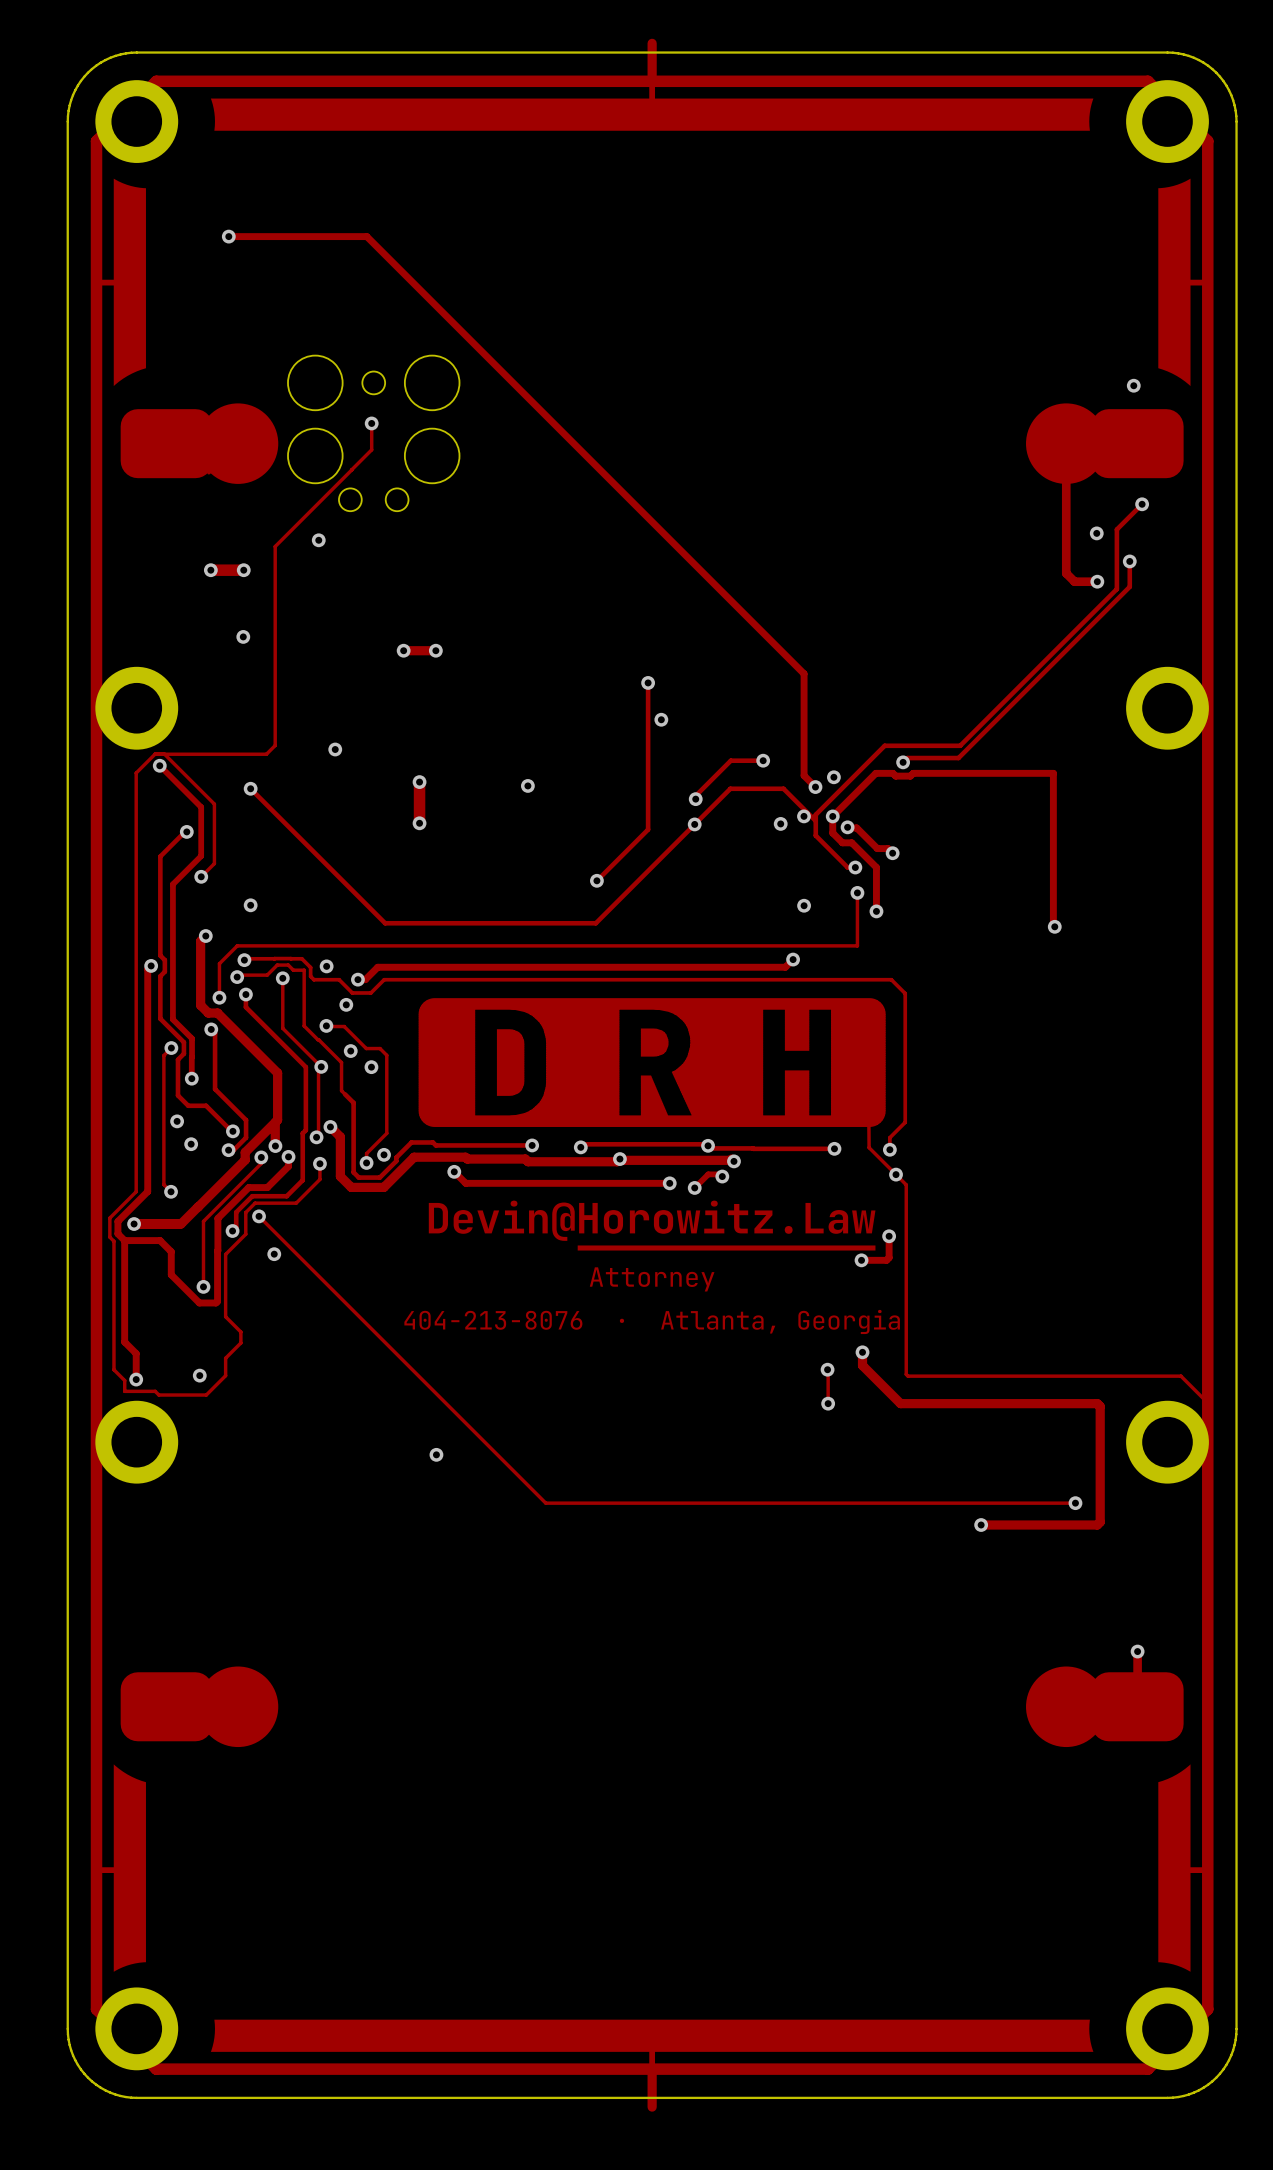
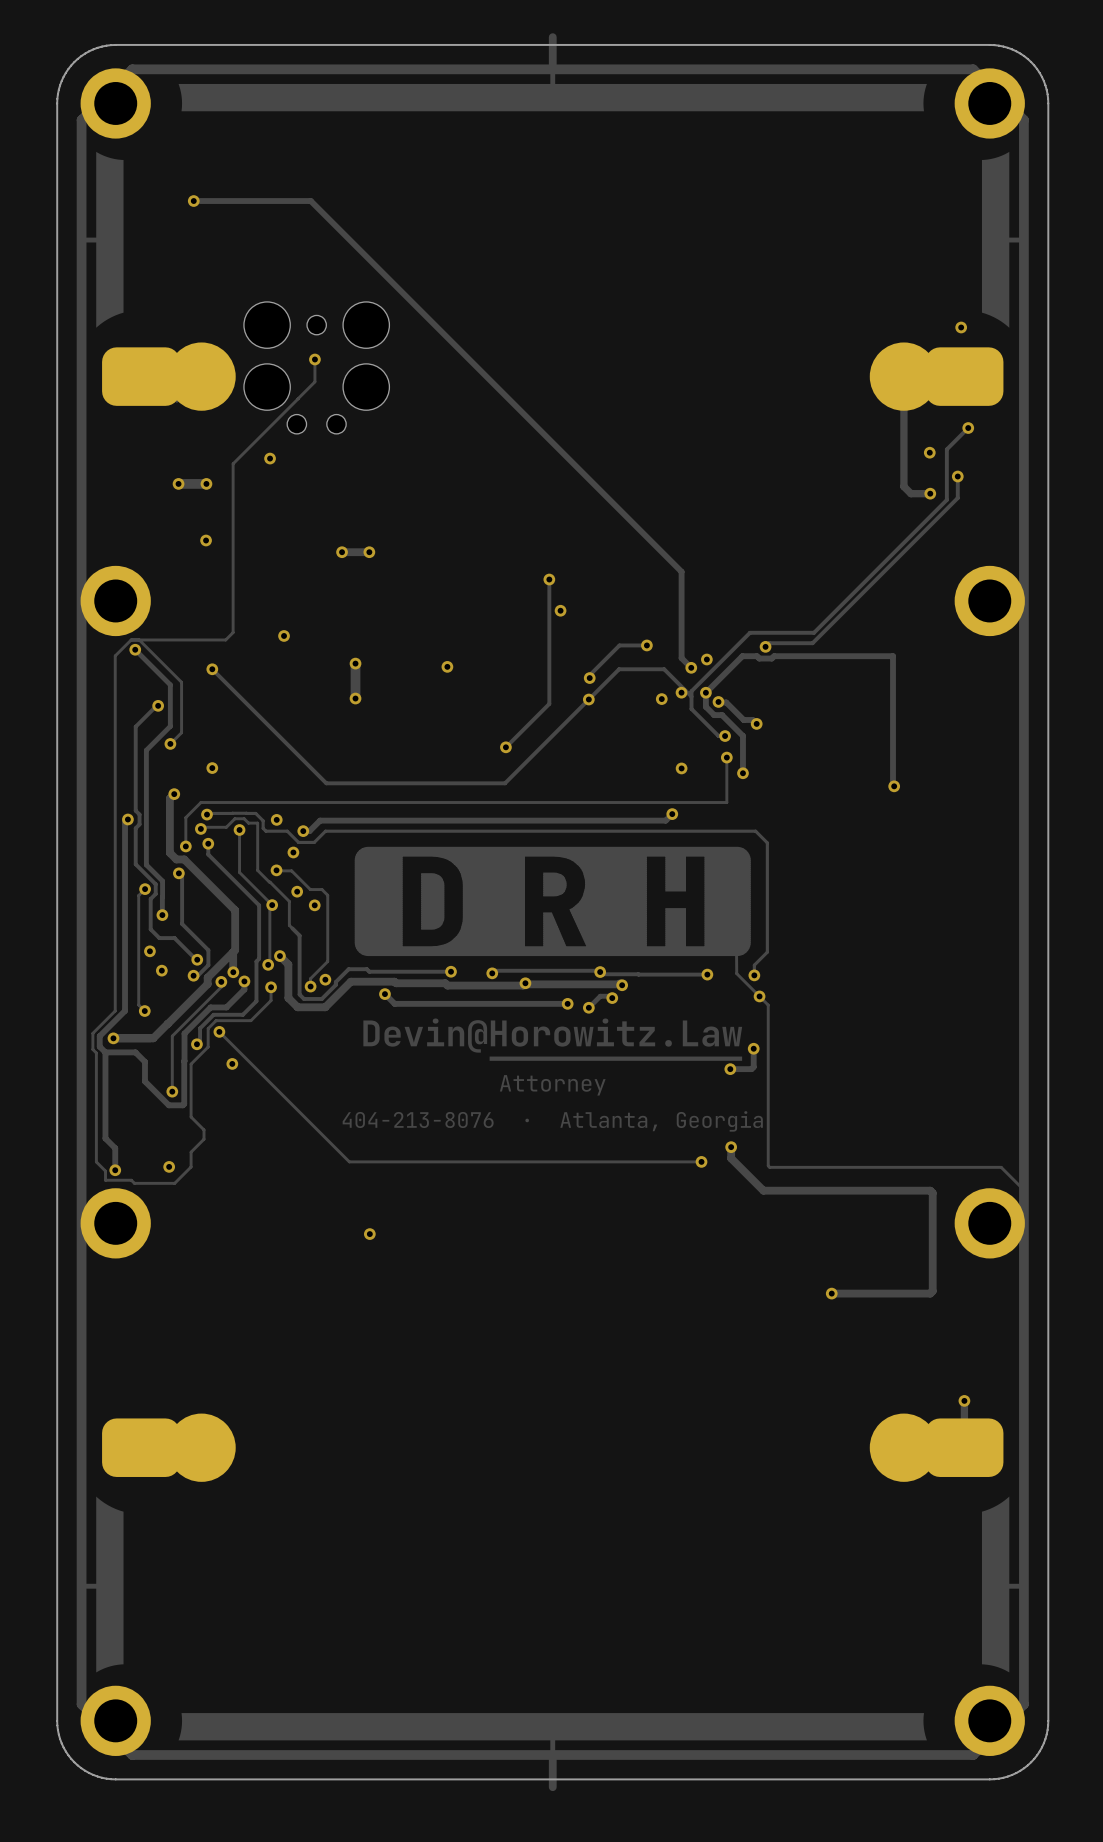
track: (412, 1369) (545, 1503) (1075, 1503) -> (349, 1161) (701, 1161)
track: (827, 1369) (828, 1403) -> none
via: (828, 1403) -> none
via: (1075, 1503) -> none

